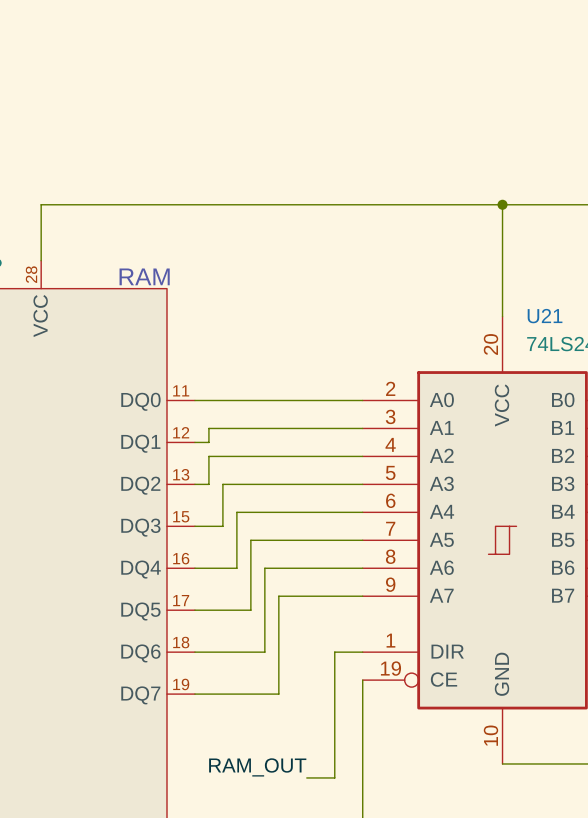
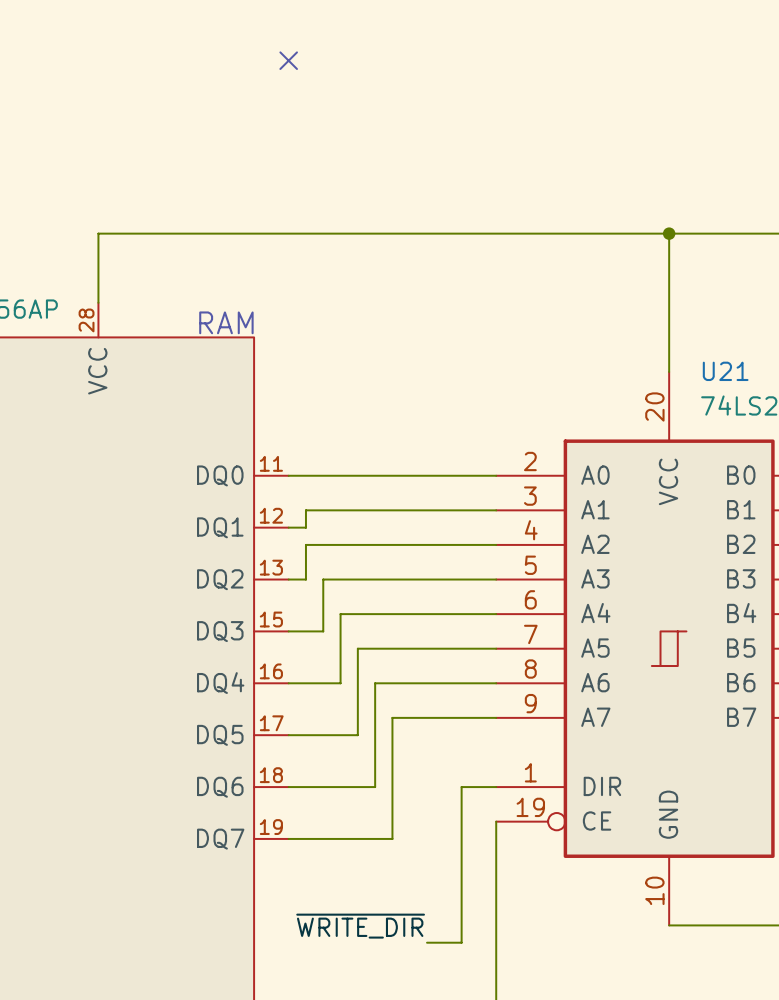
no-connect mark: none -> (288, 60)
label: RAM_OUT (257, 767) -> ~{WRITE_DIR} (360, 926)

